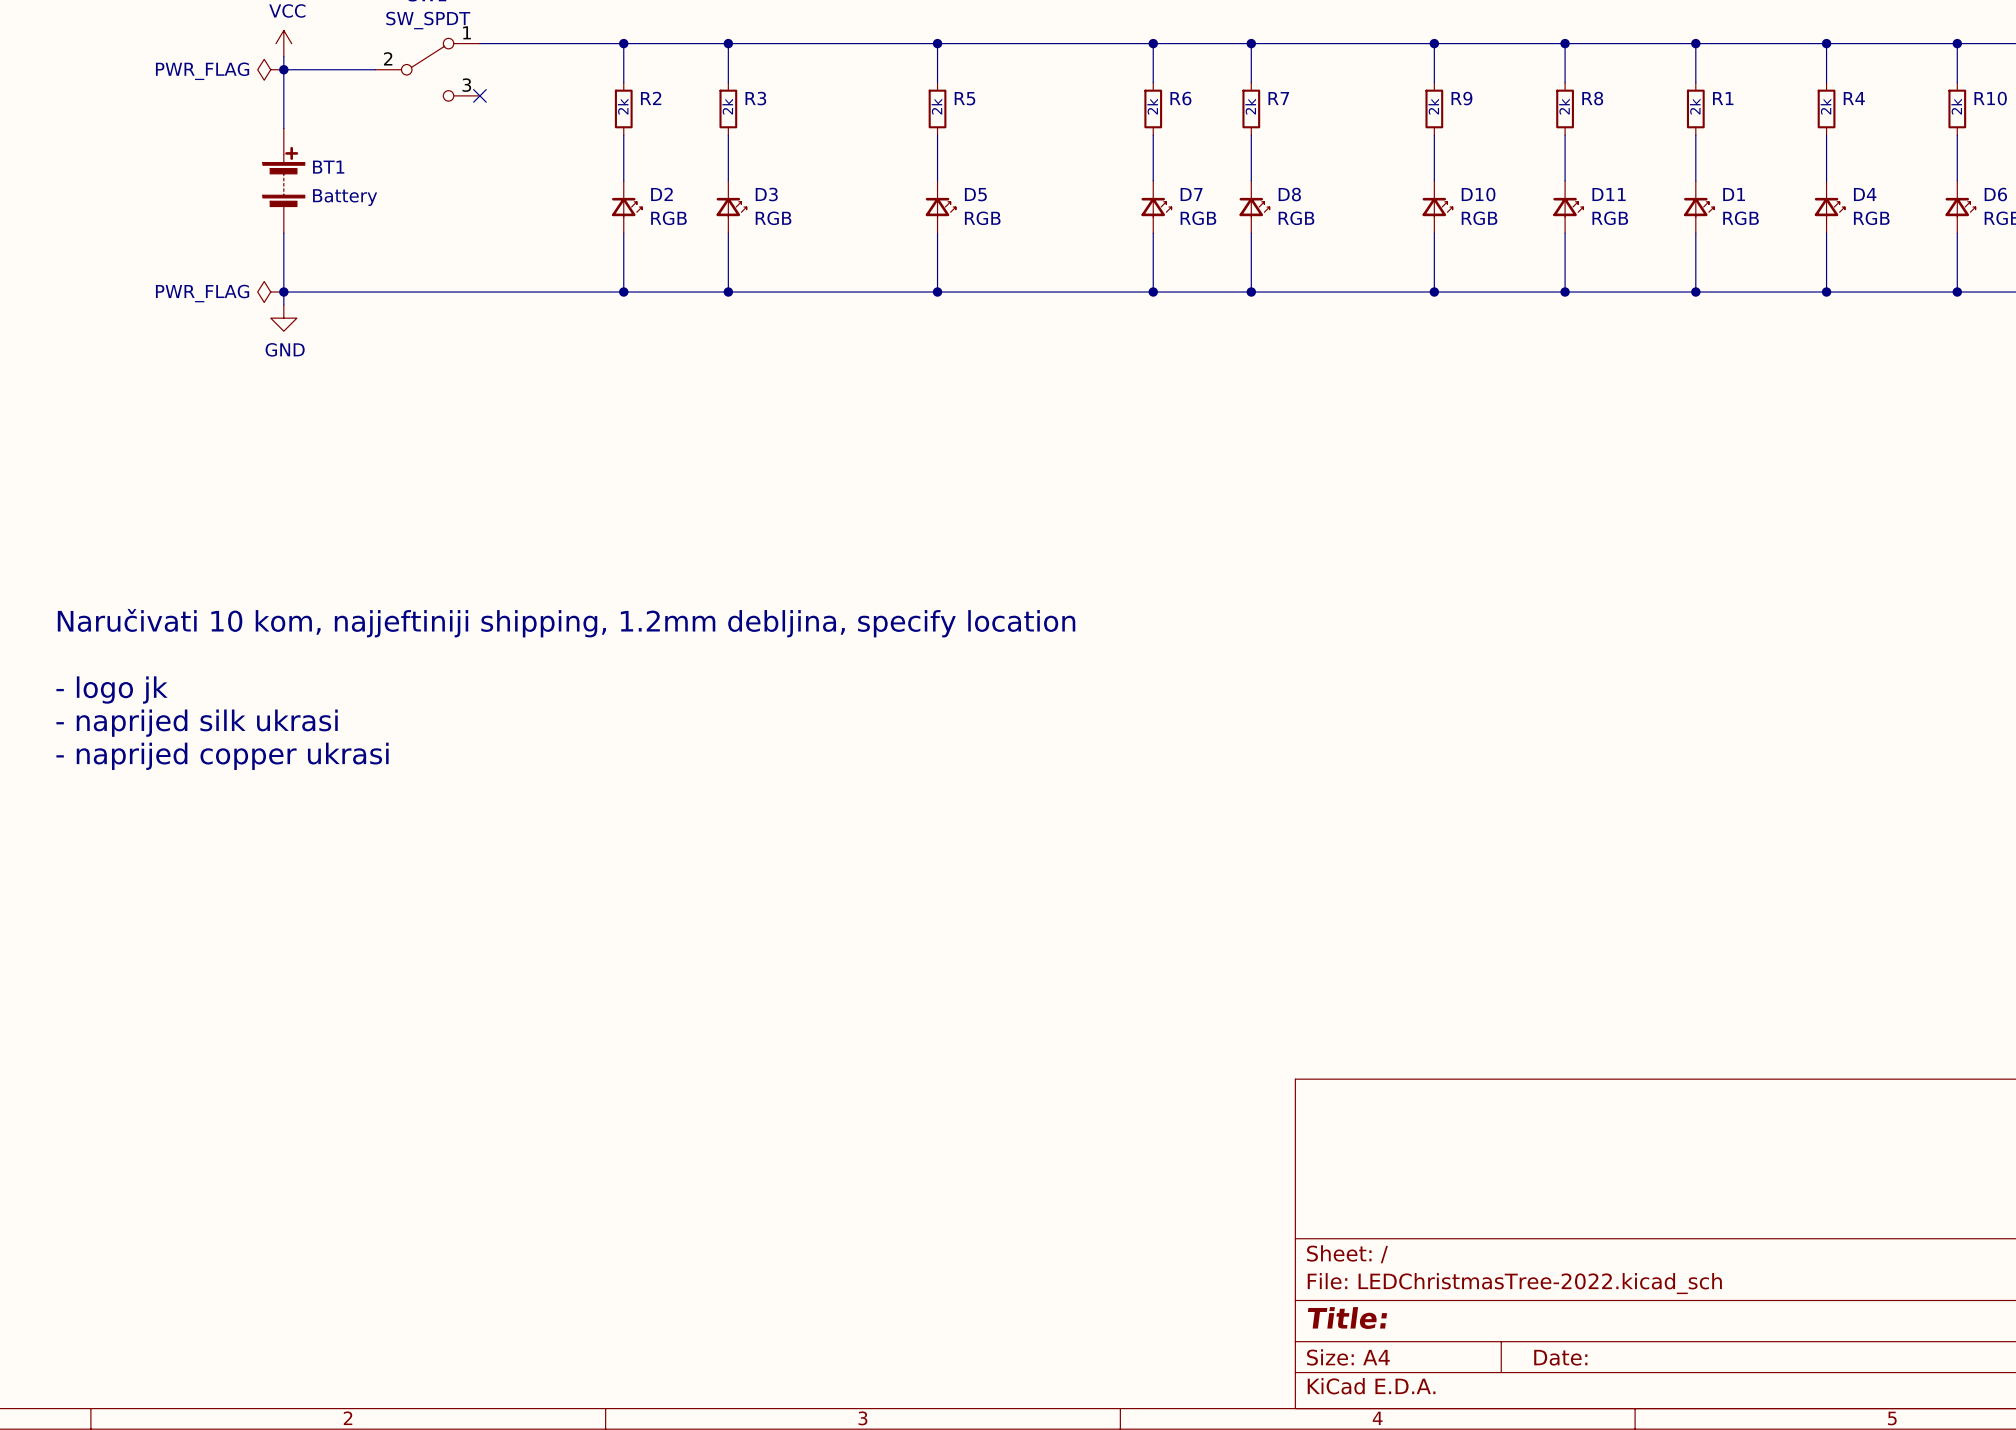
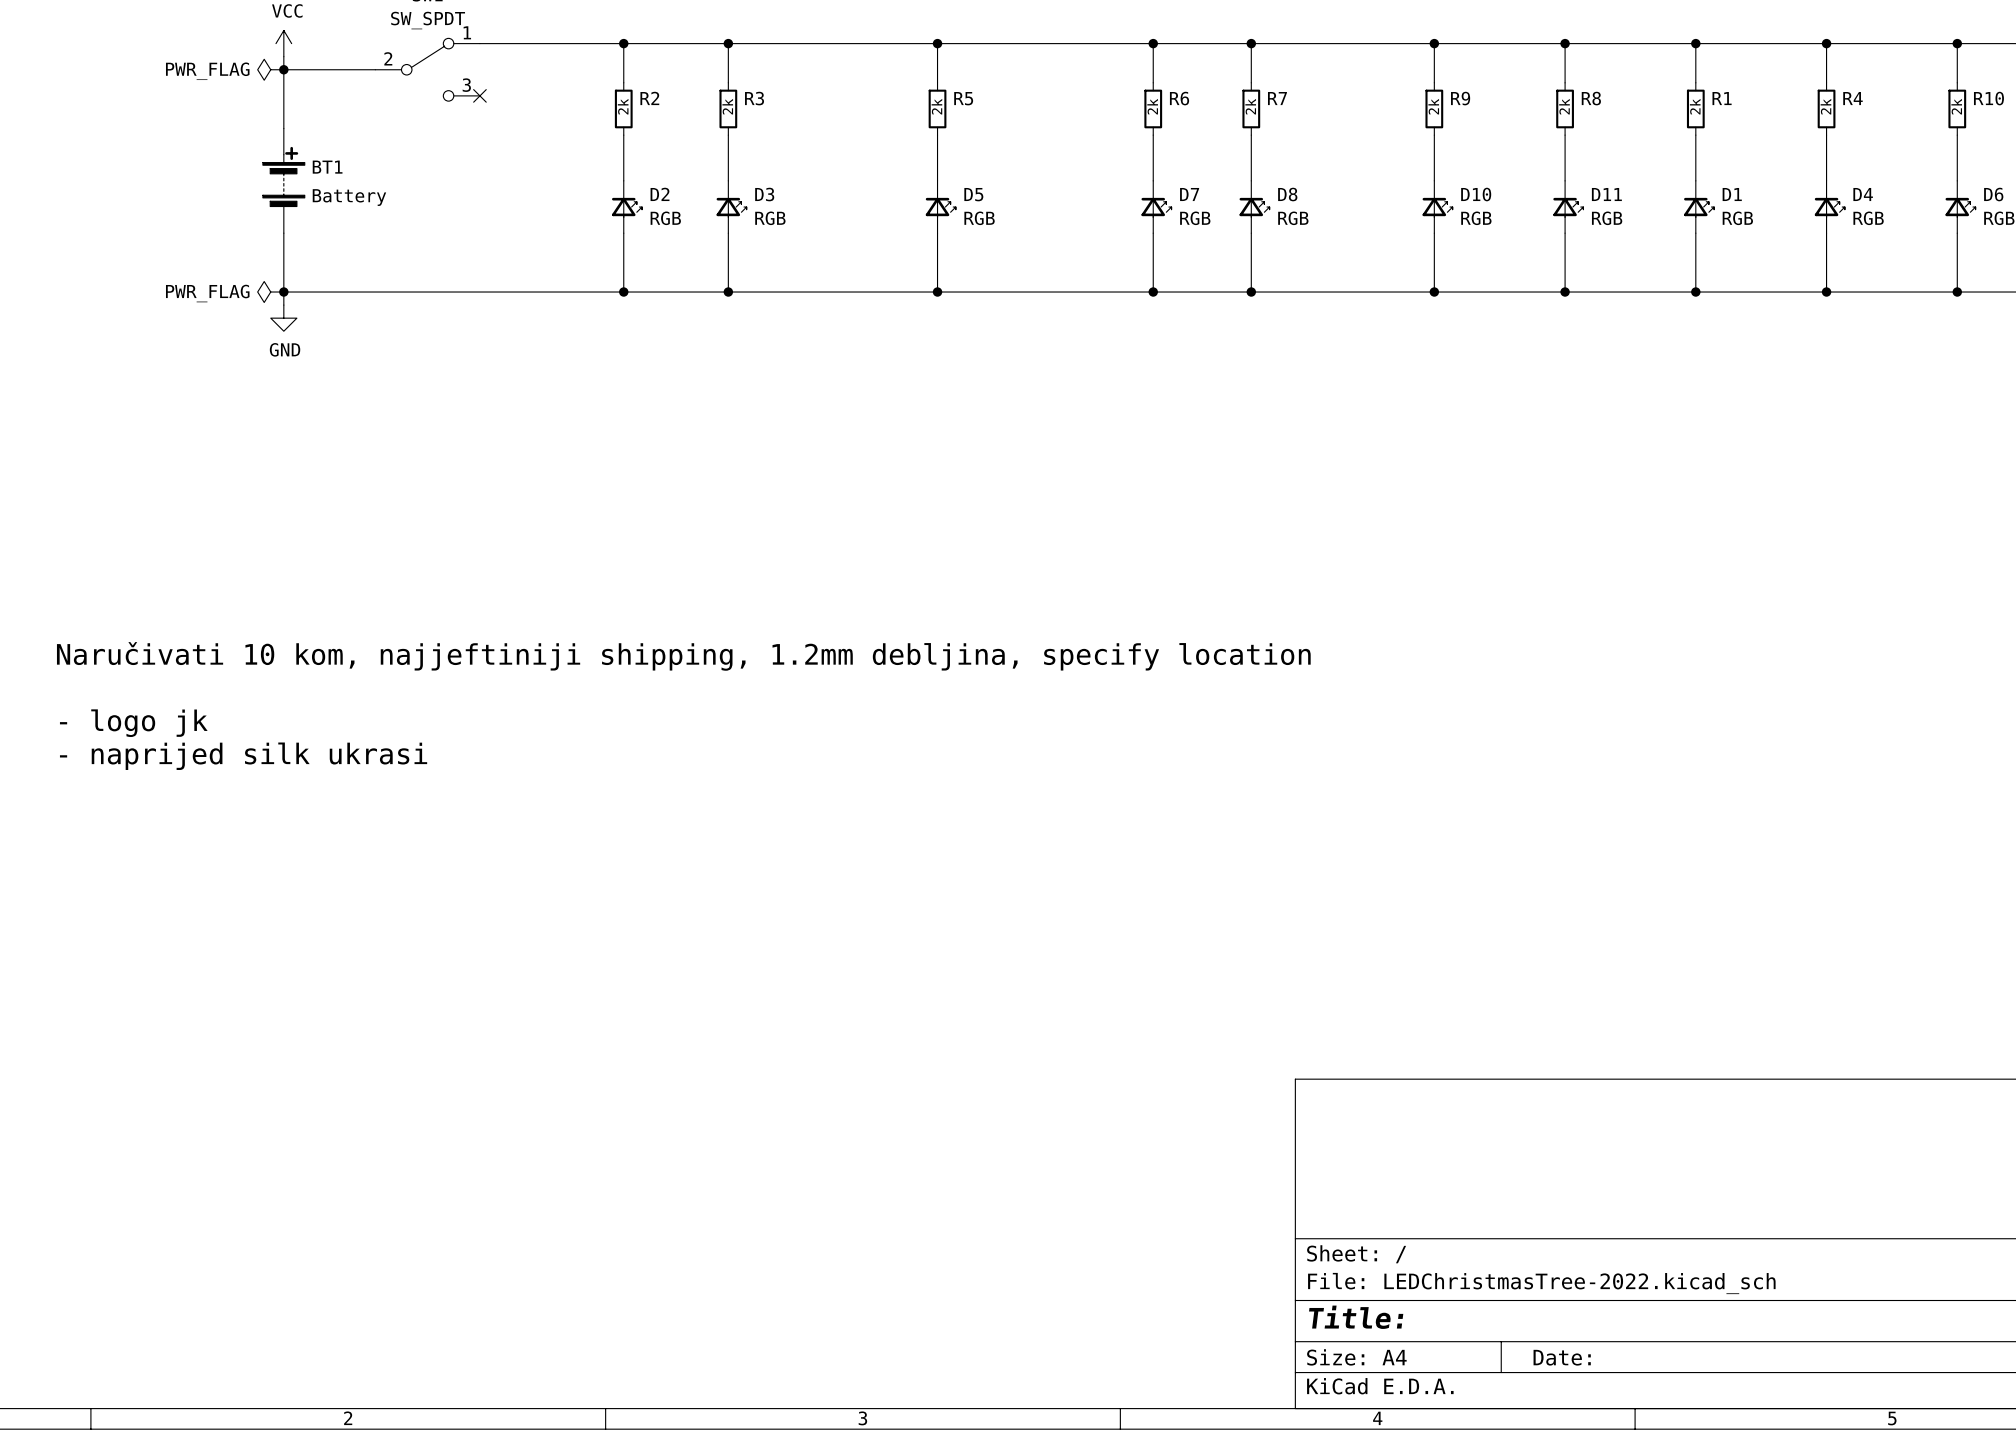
text position: Naručivati 10 kom, najjeftiniji shipping, 1.2mm debljina, specify location (566, 623) -> Naručivati 10 kom, najjeftiniji shipping, 1.2mm debljina, specify location (683, 656)
text: - logo jk (112, 690) -> none
text: - naprijed silk ukrasi (197, 723) -> - logo jk (133, 723)
text: - naprijed copper ukrasi (222, 756) -> - naprijed silk ukrasi (243, 756)

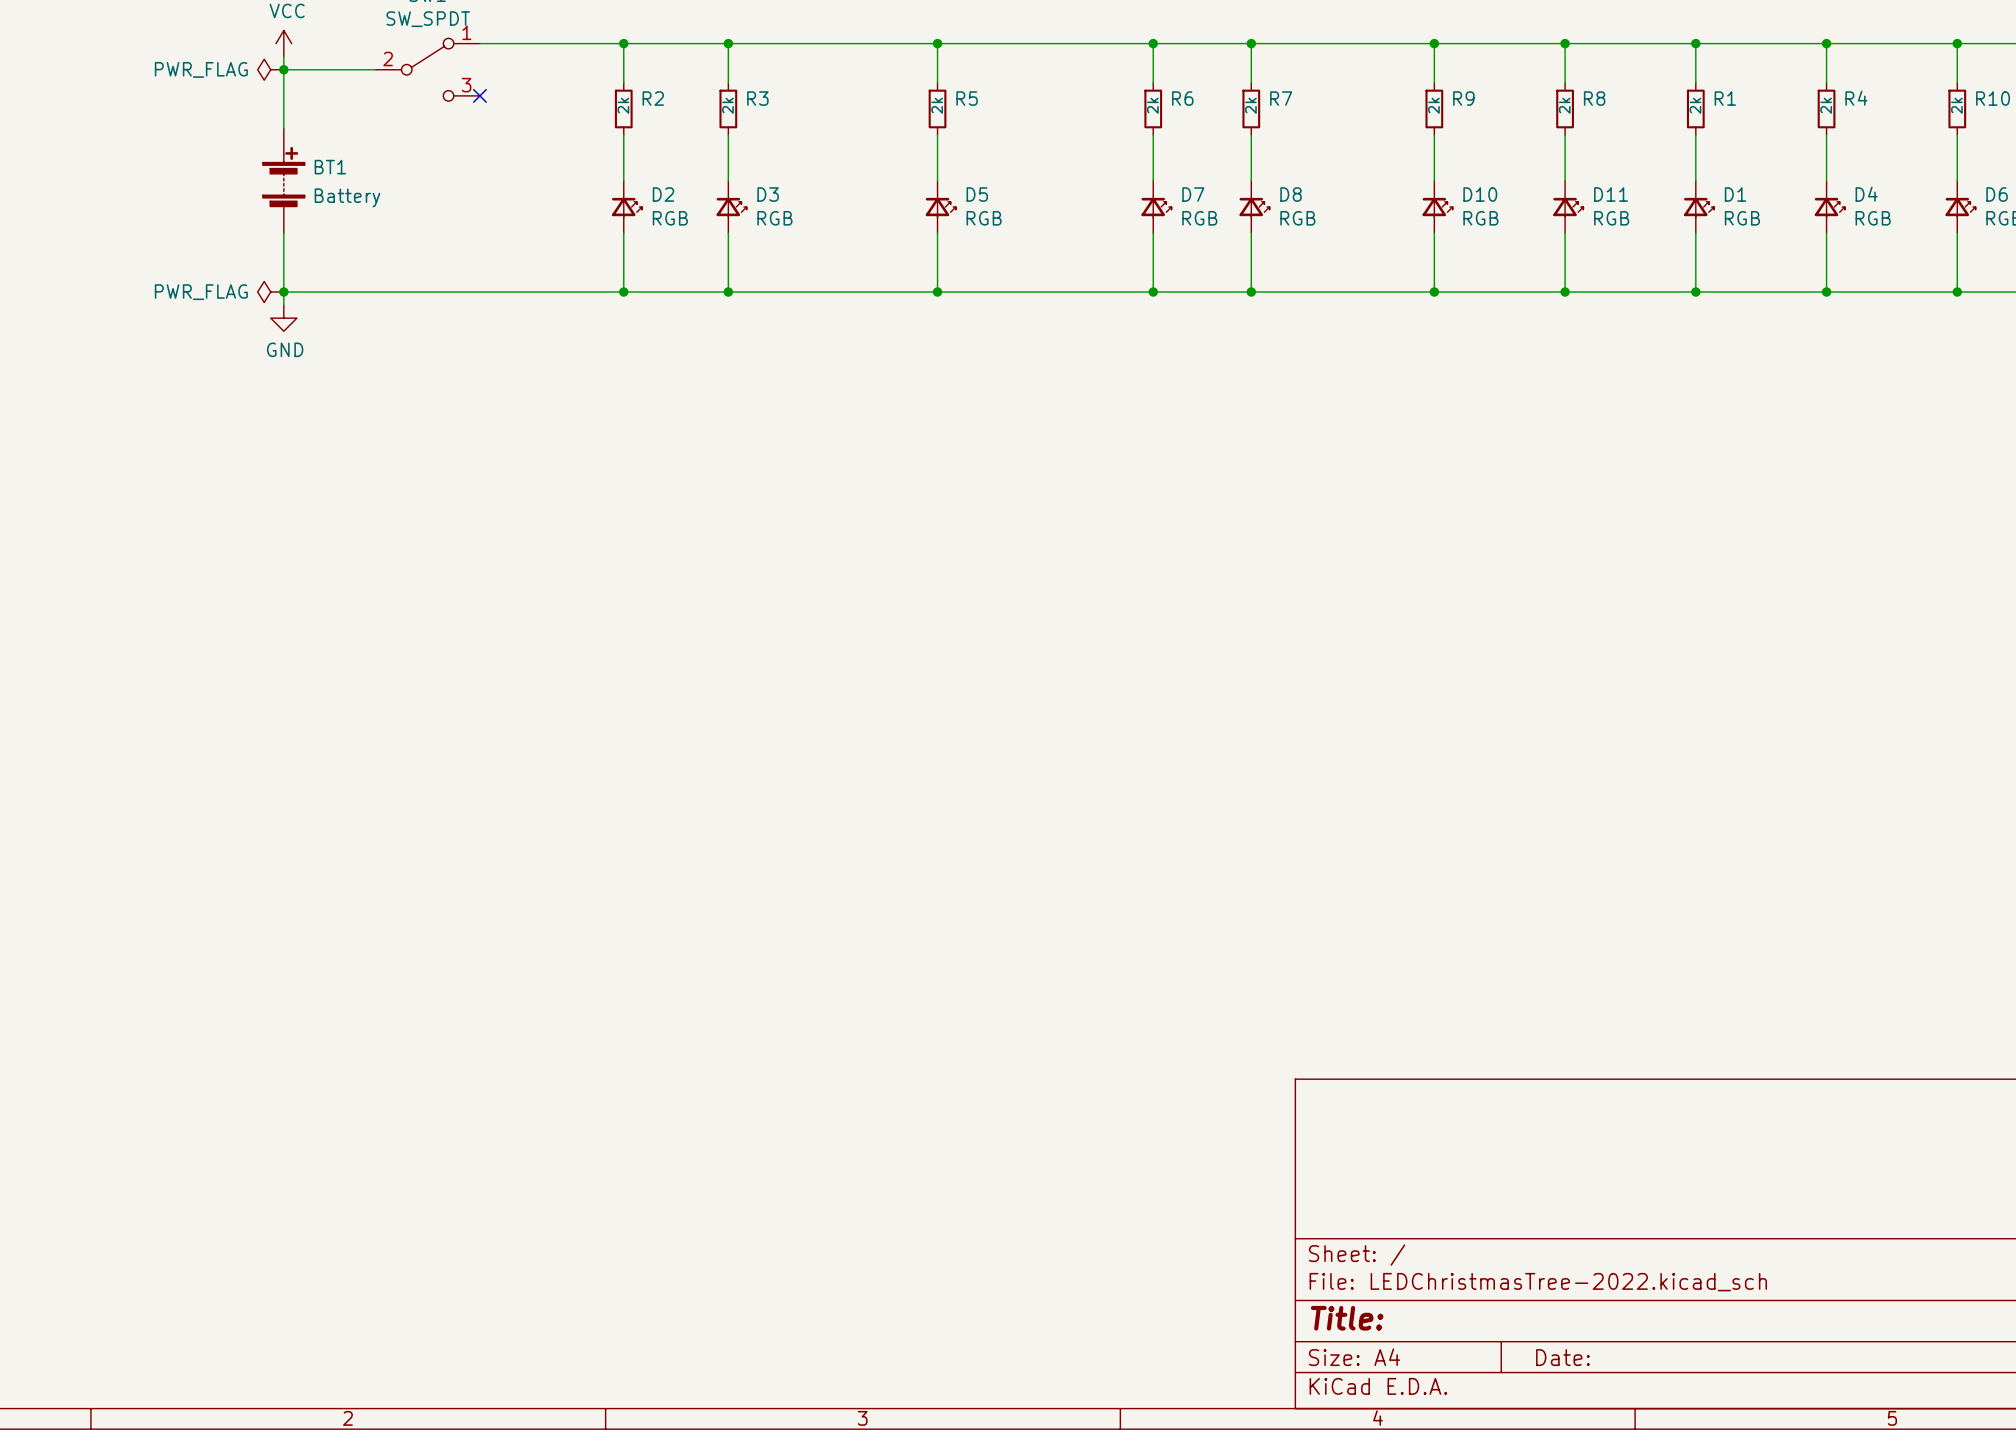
text: Naručivati 10 kom, najjeftiniji shipping, 1.2mm debljina, specify location (683, 656) -> none
text: - logo jk (133, 723) -> none
text: - naprijed silk ukrasi (243, 756) -> none

